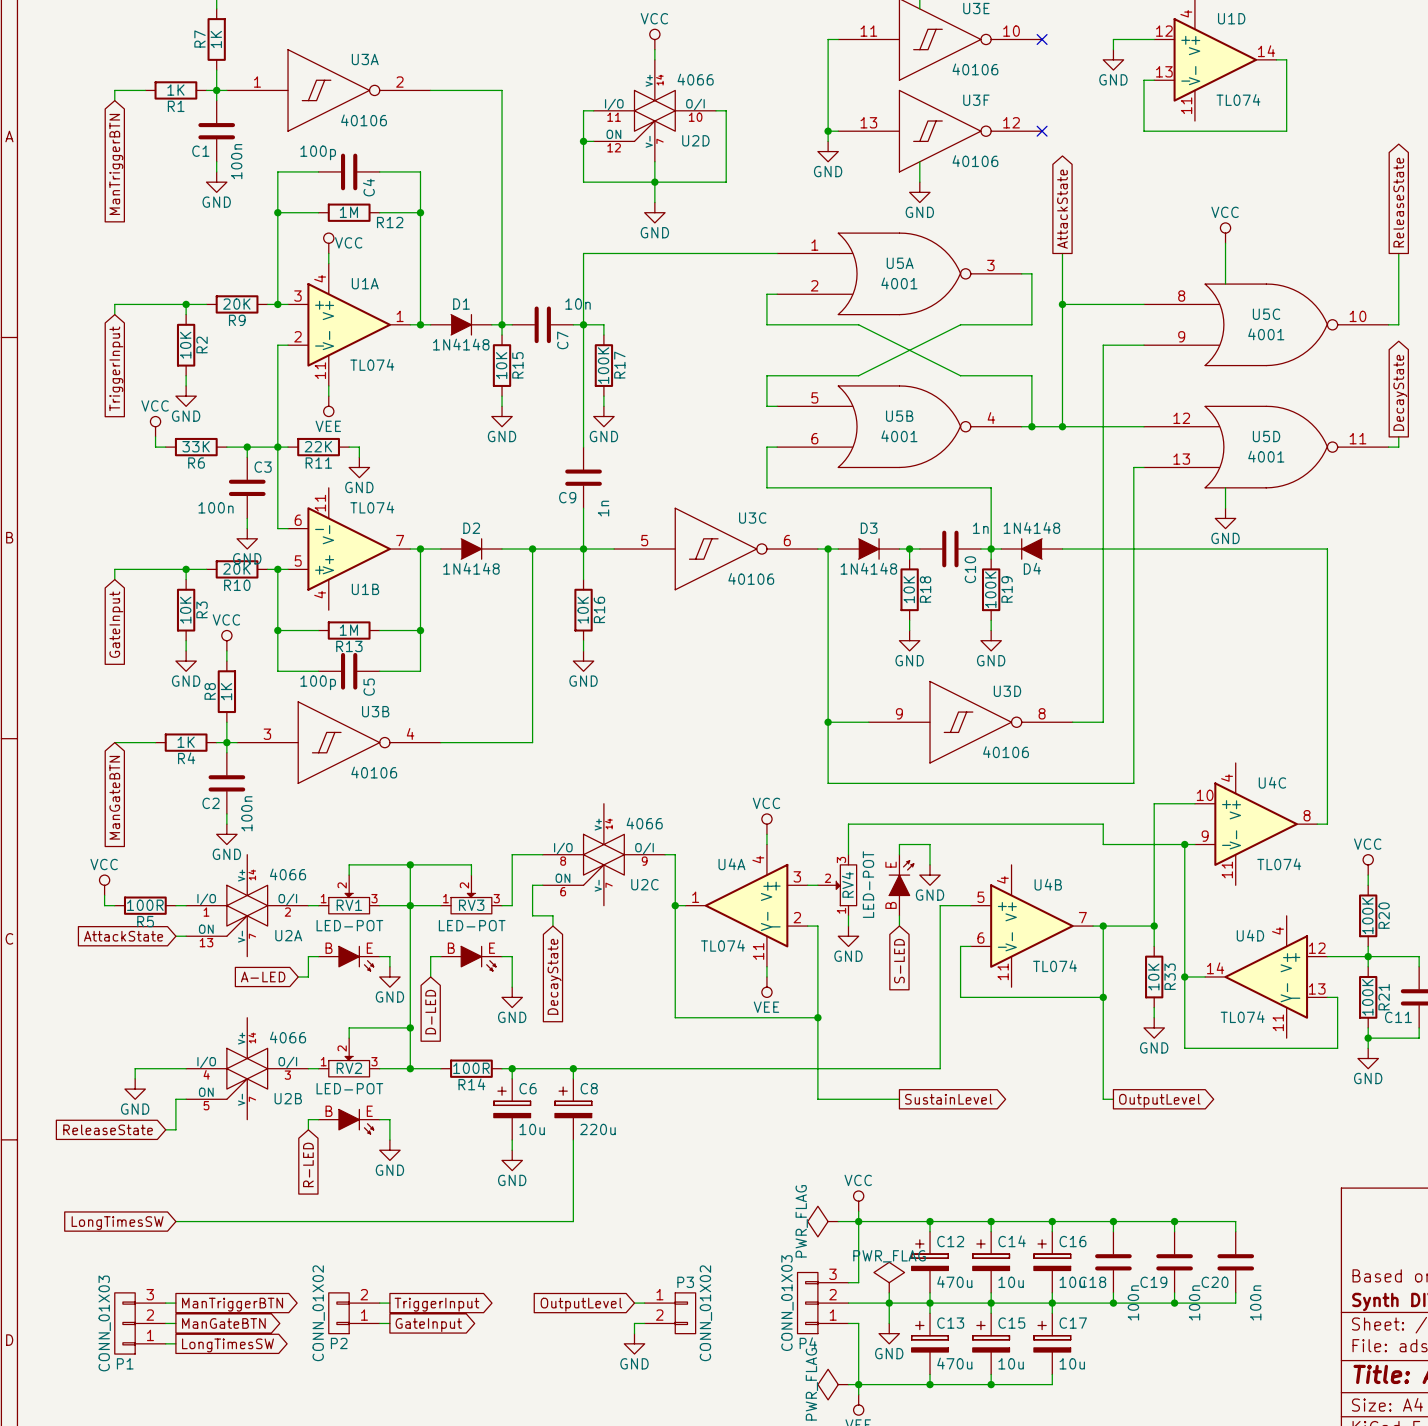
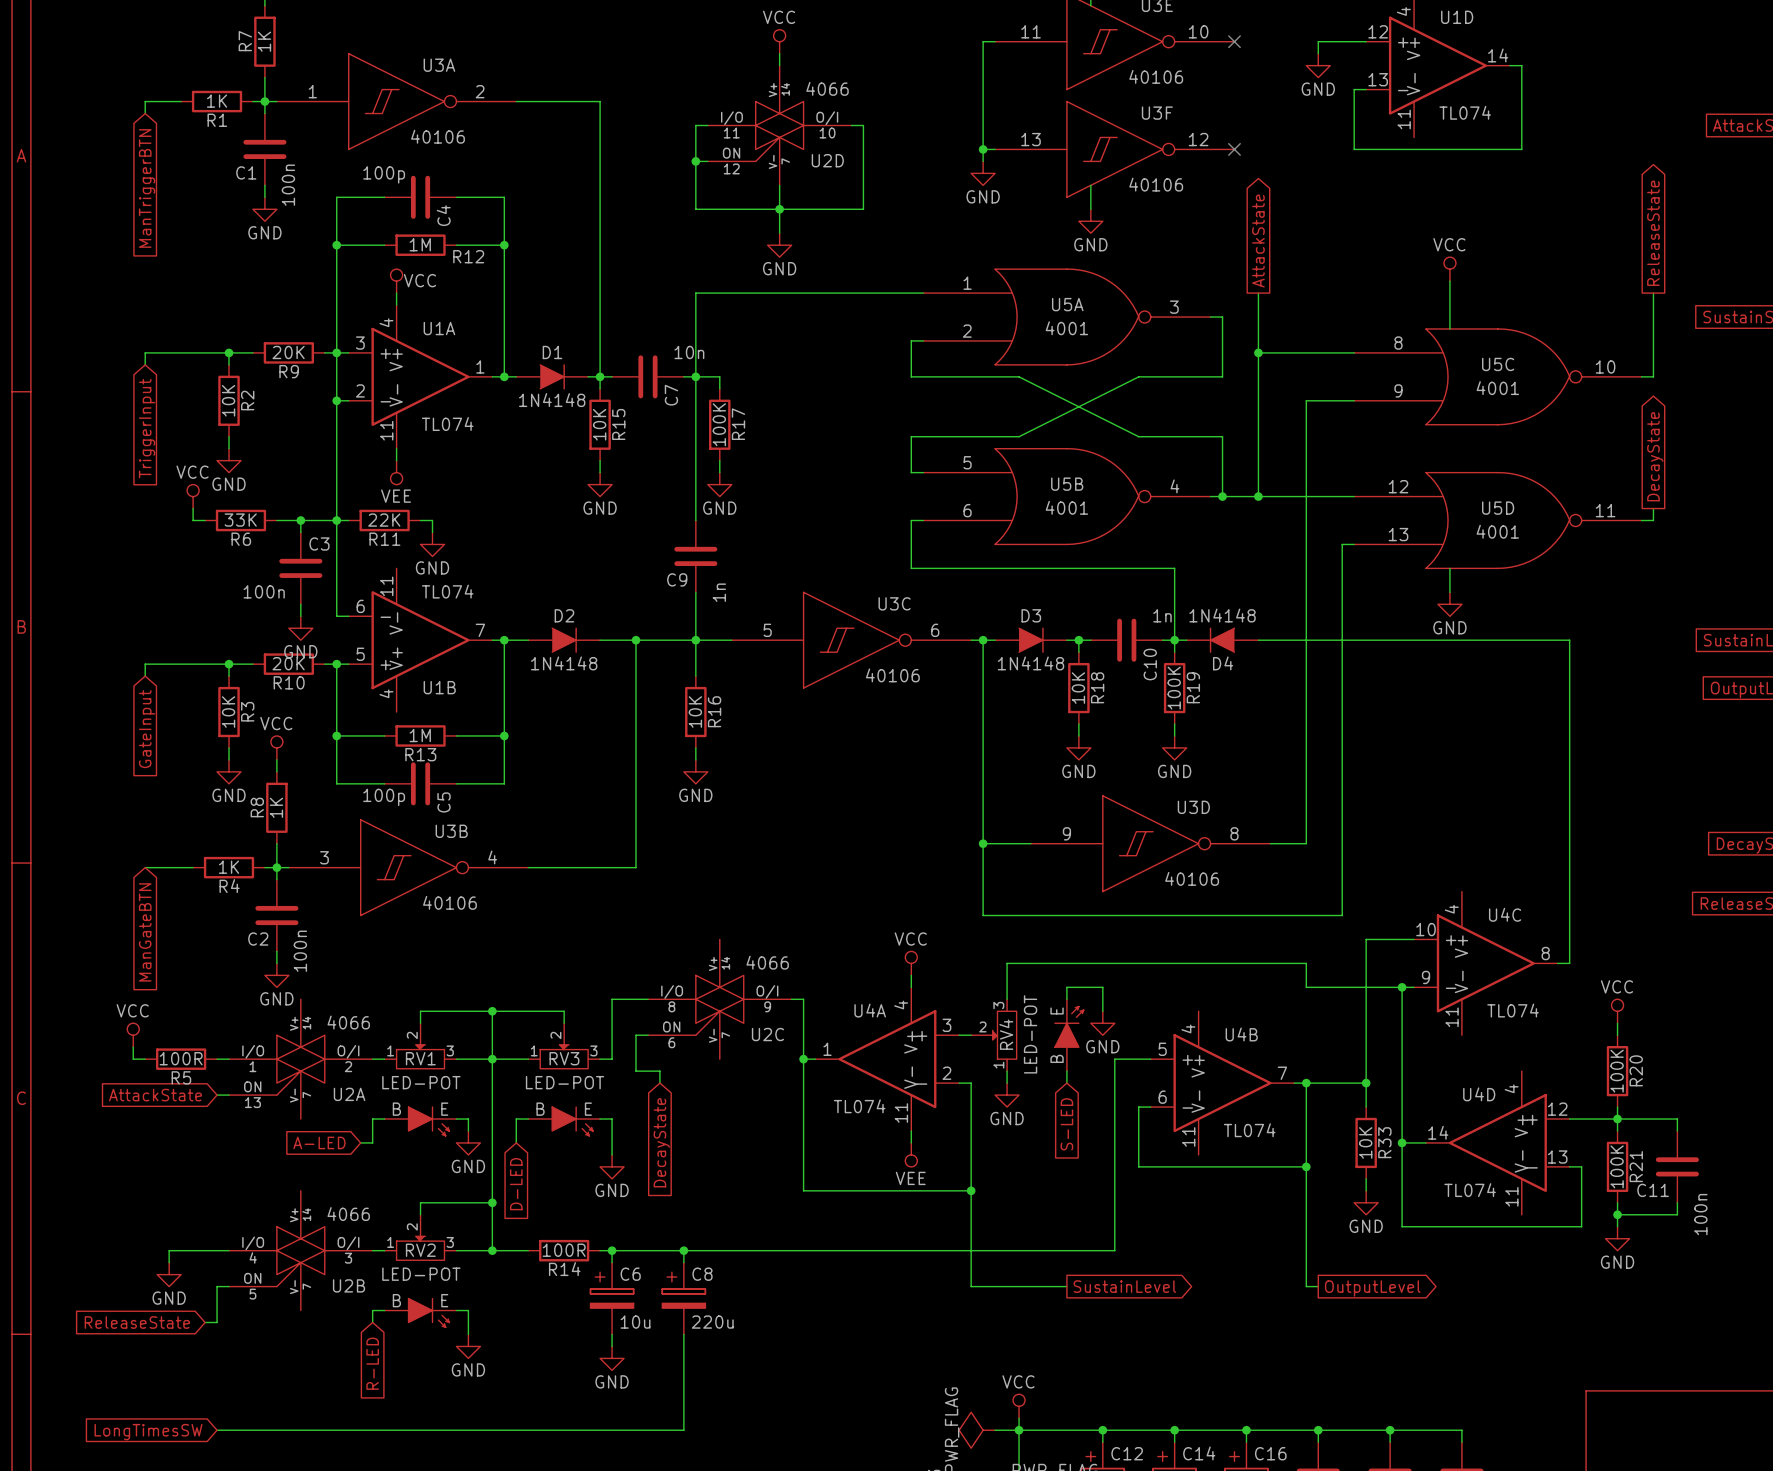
wire: none -> (336, 352) (336, 400)
junction: none -> (336, 400)

